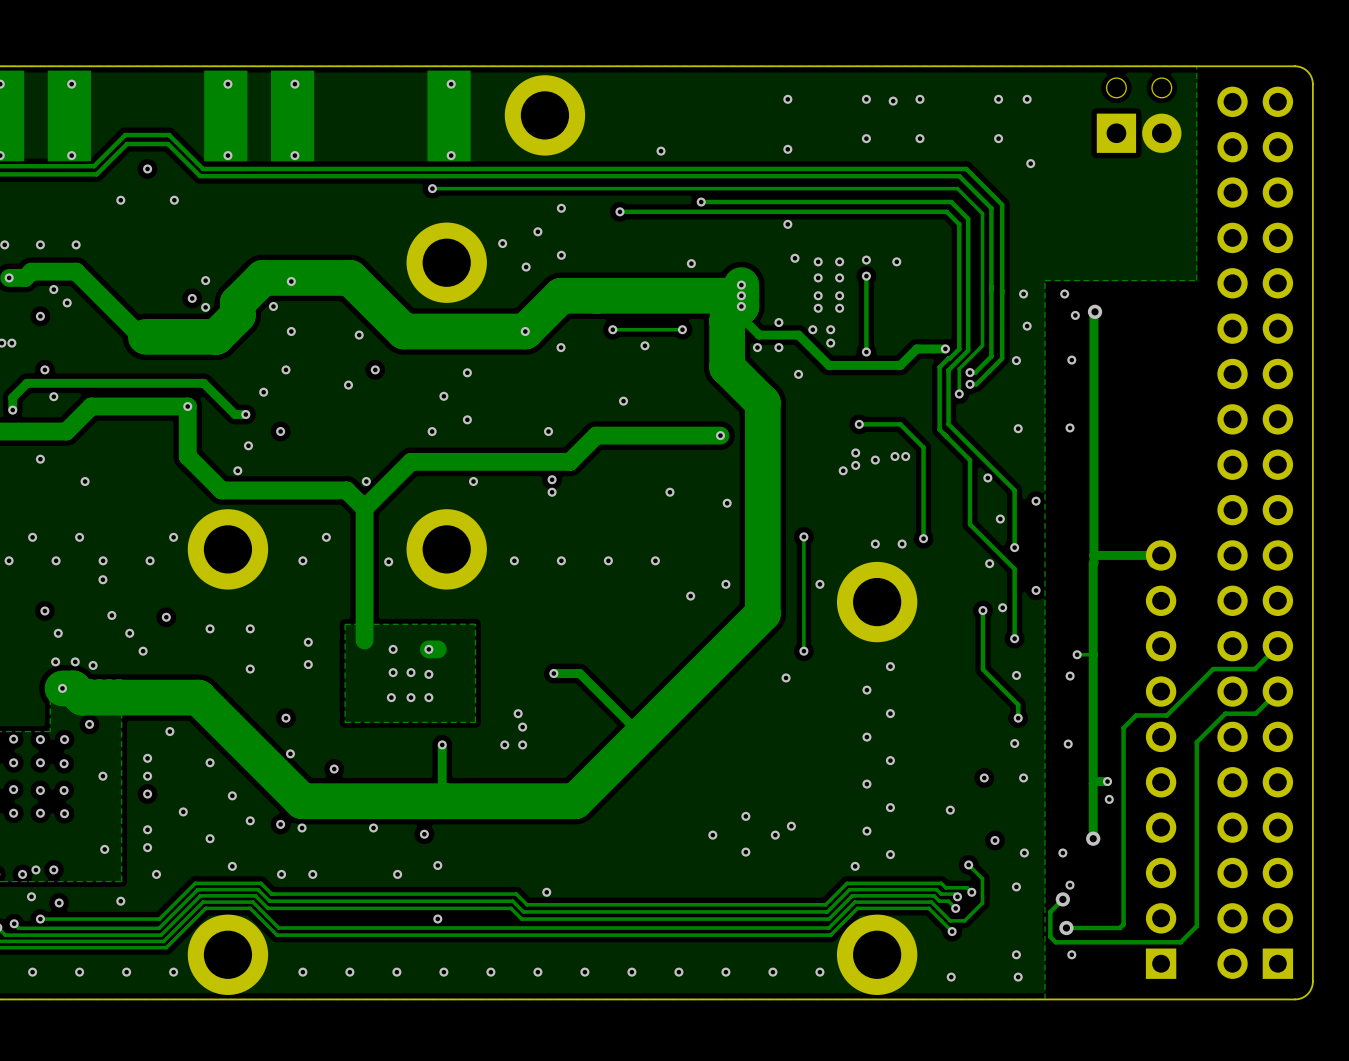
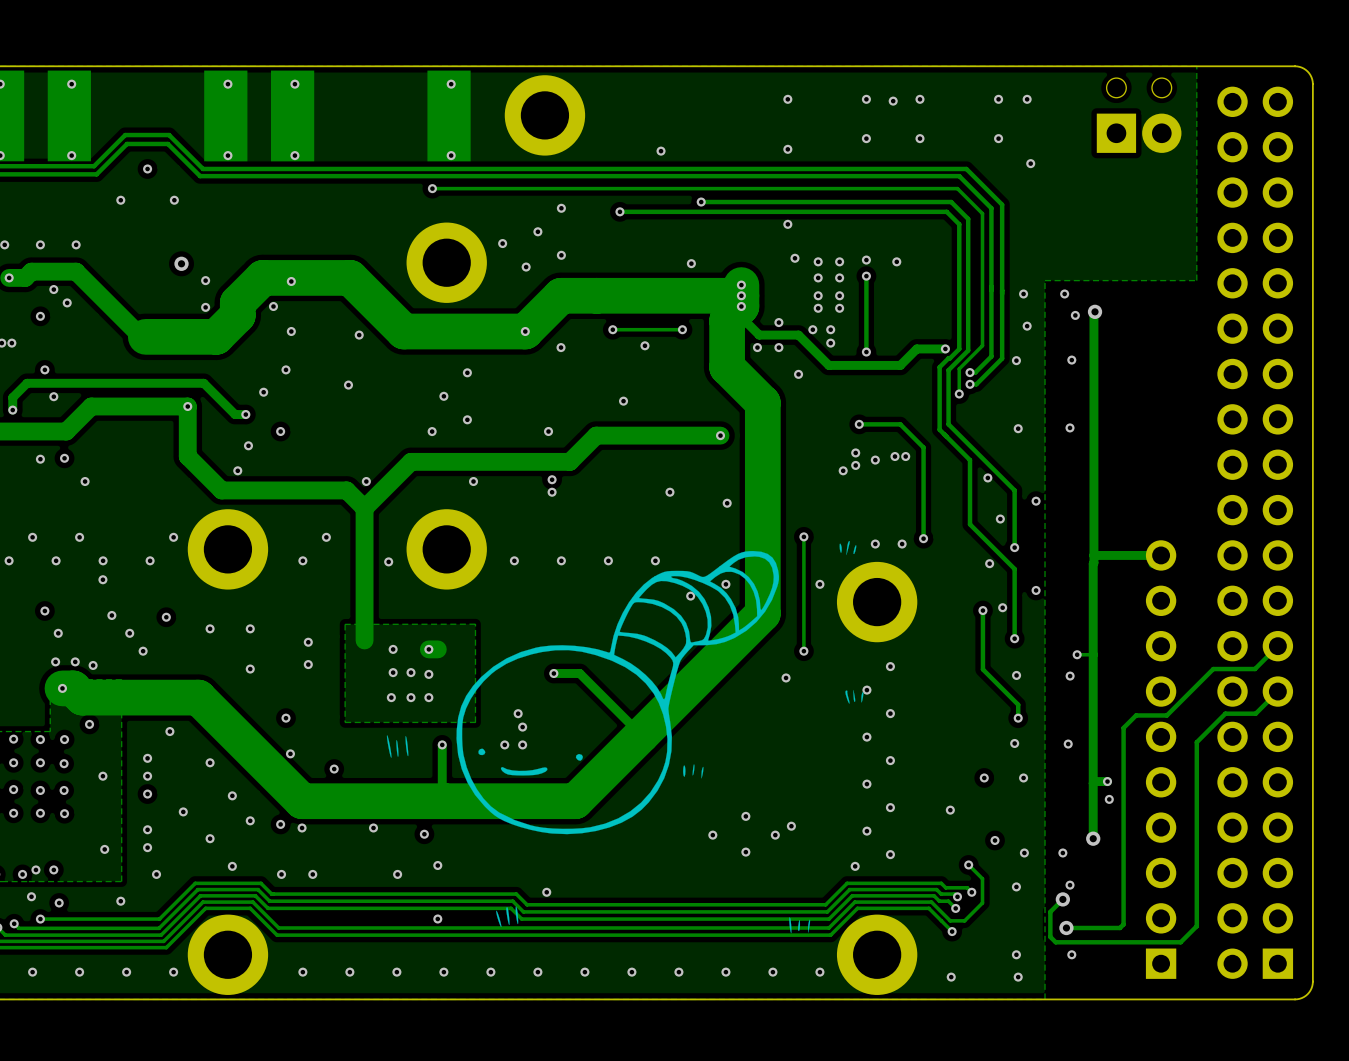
via: none -> (181, 263)
via: (192, 298) -> none
via: (375, 369) -> none
via: none -> (64, 458)
drawing: none -> [386, 540, 864, 934]

